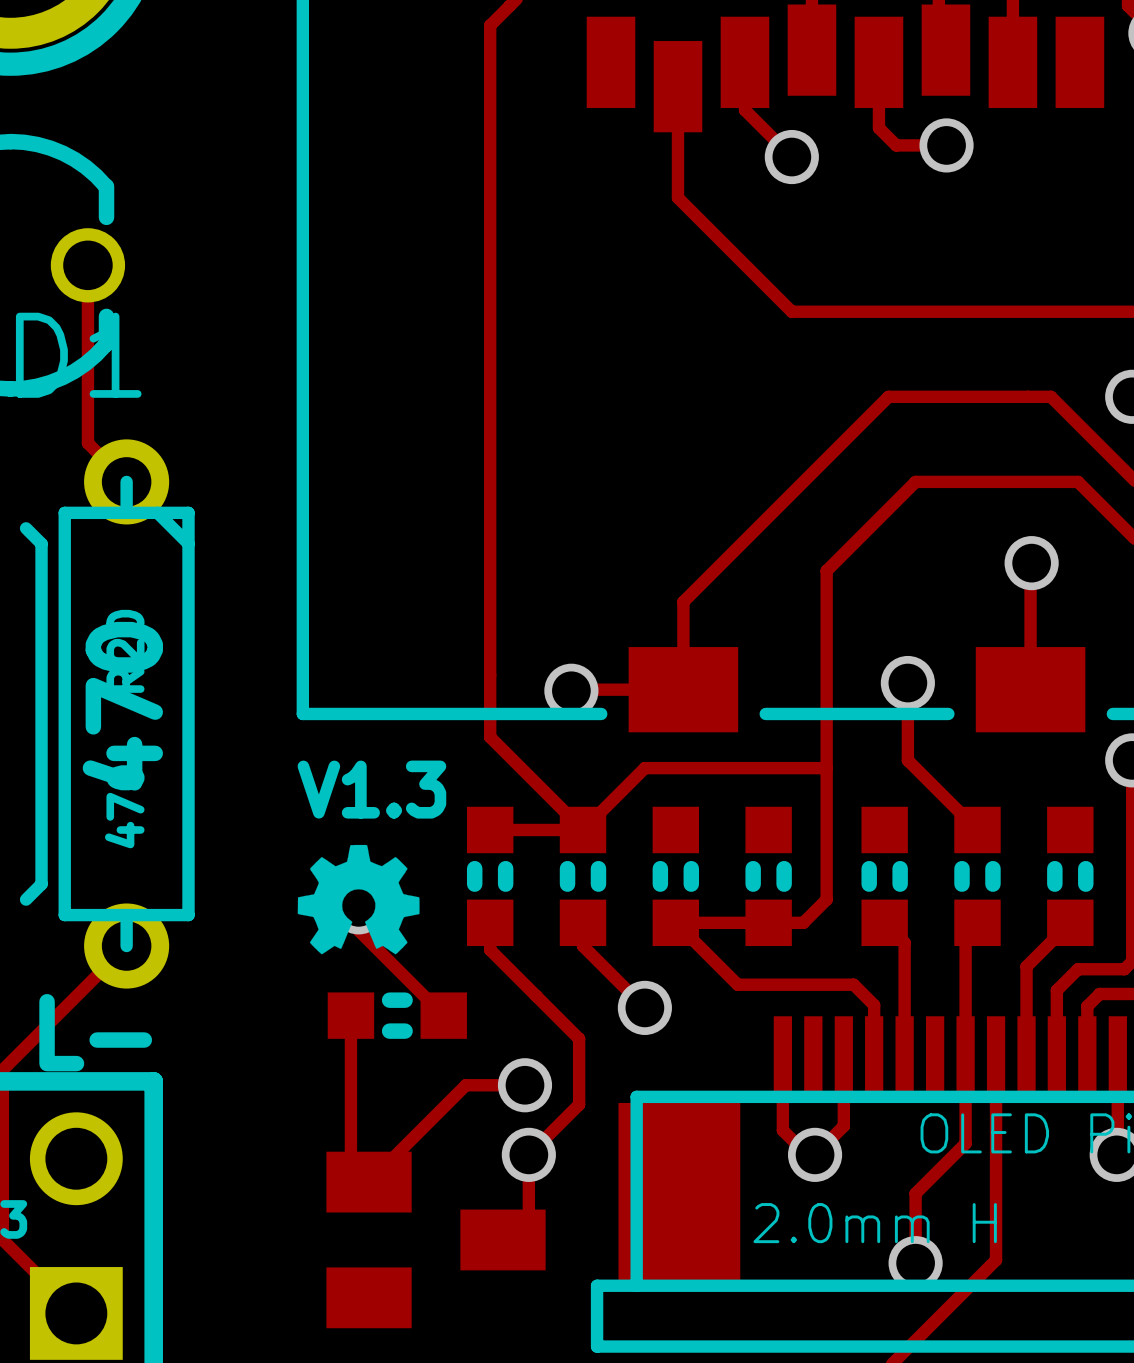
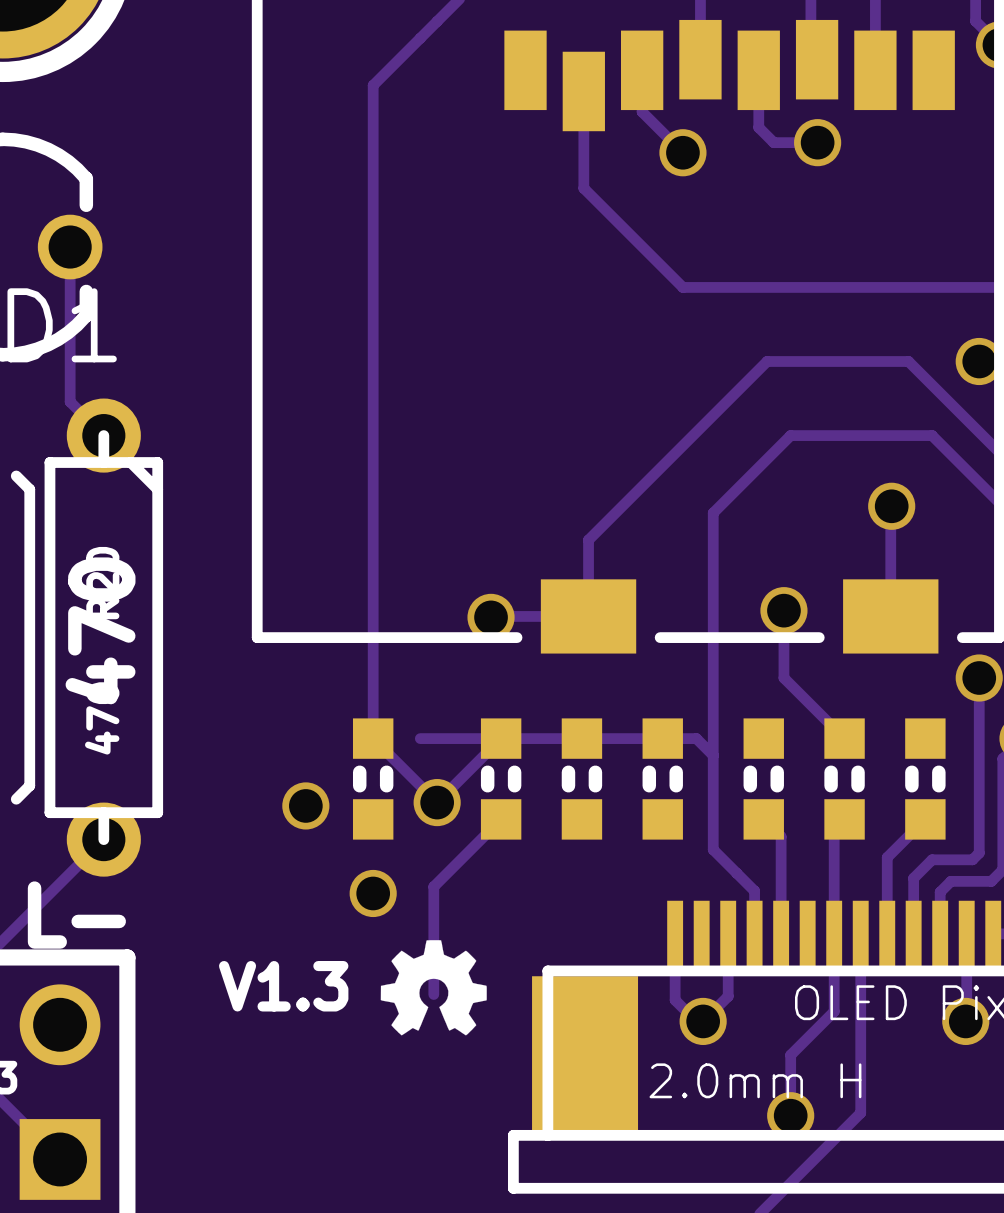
track: (490, 25) (490, 737) (583, 829) (644, 768) (826, 768) -> (420, 38) (373, 85) (373, 738) (437, 802) (501, 738) (696, 738) (713, 755)
text position: V1.3 (371, 789) -> V1.3 (283, 986)
part position: (490, 876) -> (373, 779)
drawing position: (358, 899) -> (433, 987)
track: (826, 899) (803, 922) (675, 922) (737, 984) (853, 984) -> (713, 799) (713, 849) (736, 873)
via: none -> (437, 802)
track: (358, 907) (358, 930) (443, 1015) -> none
track: (490, 922) (490, 949) (579, 1038) (579, 1104) (528, 1154) (528, 1214) (503, 1239) -> none
track: (583, 922) (583, 946) (644, 1007) -> (501, 819) (433, 886) (433, 994)
via: none -> (373, 893)
via: (644, 1007) -> none
track: (350, 1015) (350, 1164) (369, 1182) (465, 1085) (524, 1085) -> none
part: (397, 1015) -> none
via: (524, 1085) -> none
via: (528, 1154) -> none
part: (436, 1239) -> none

